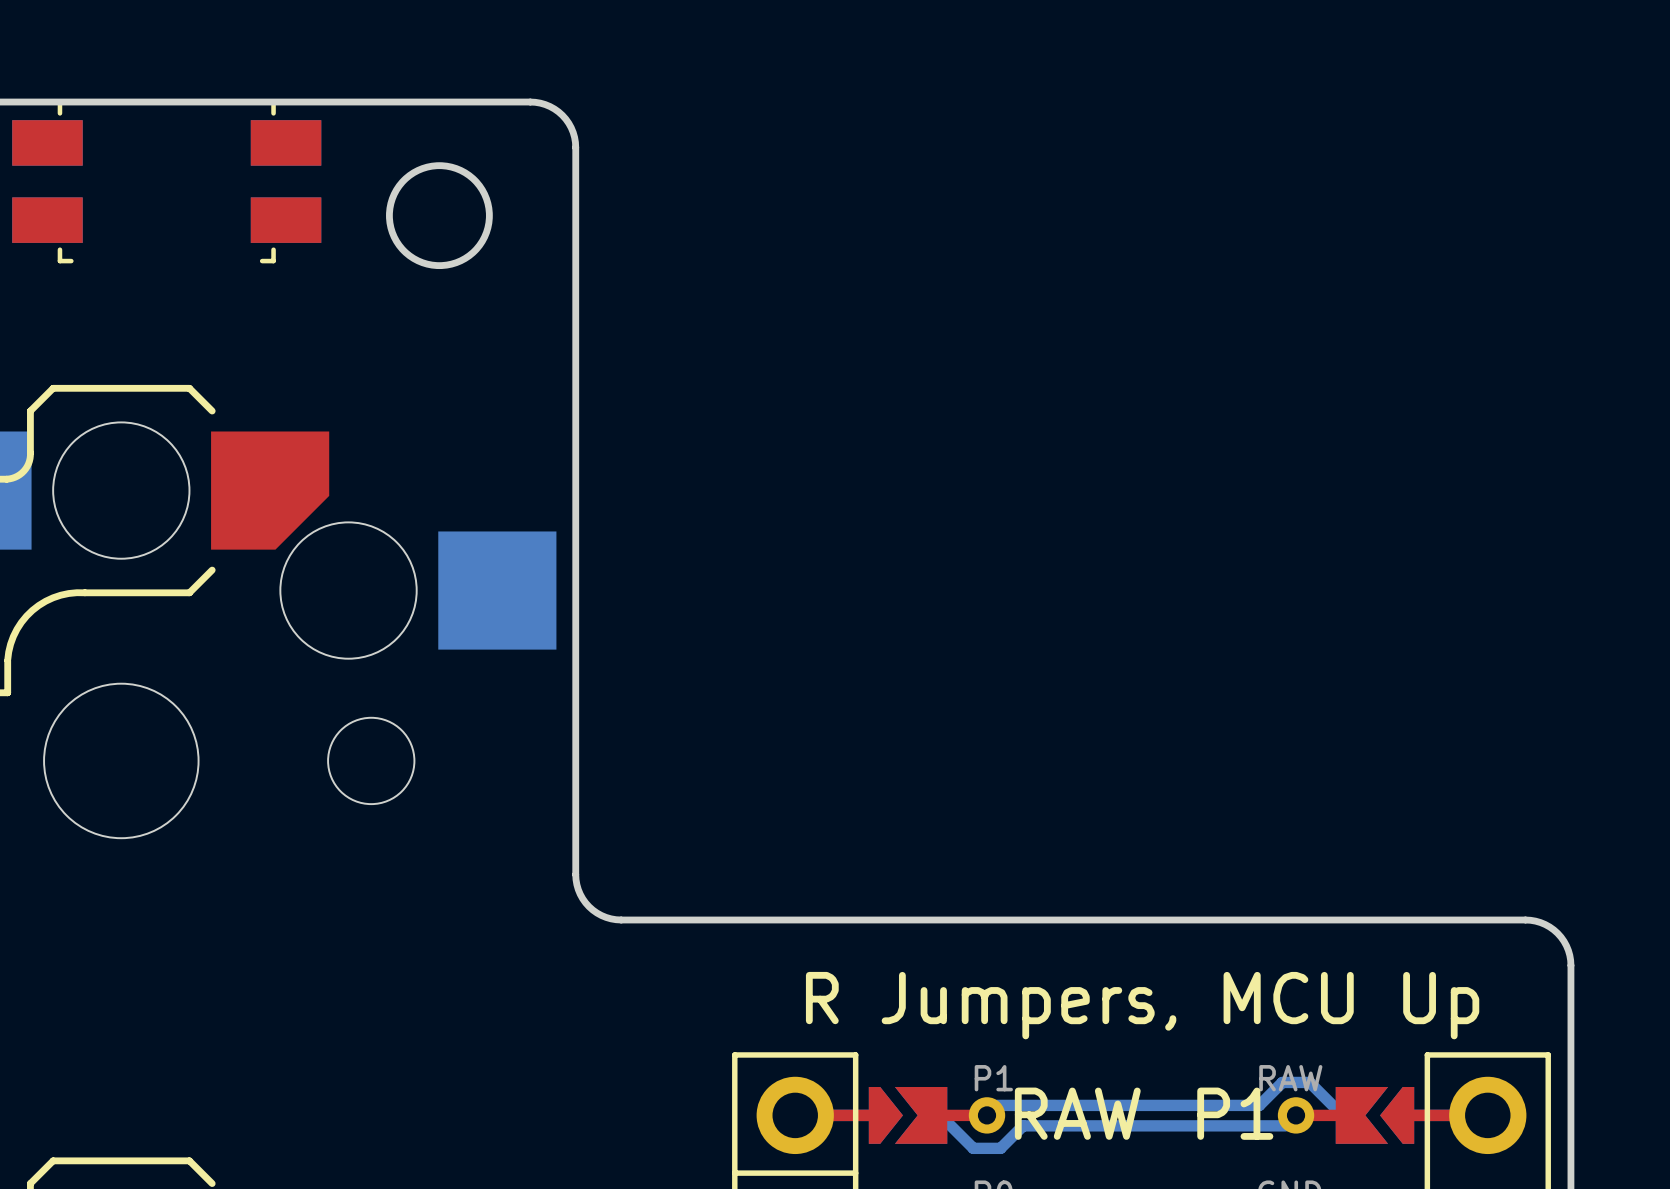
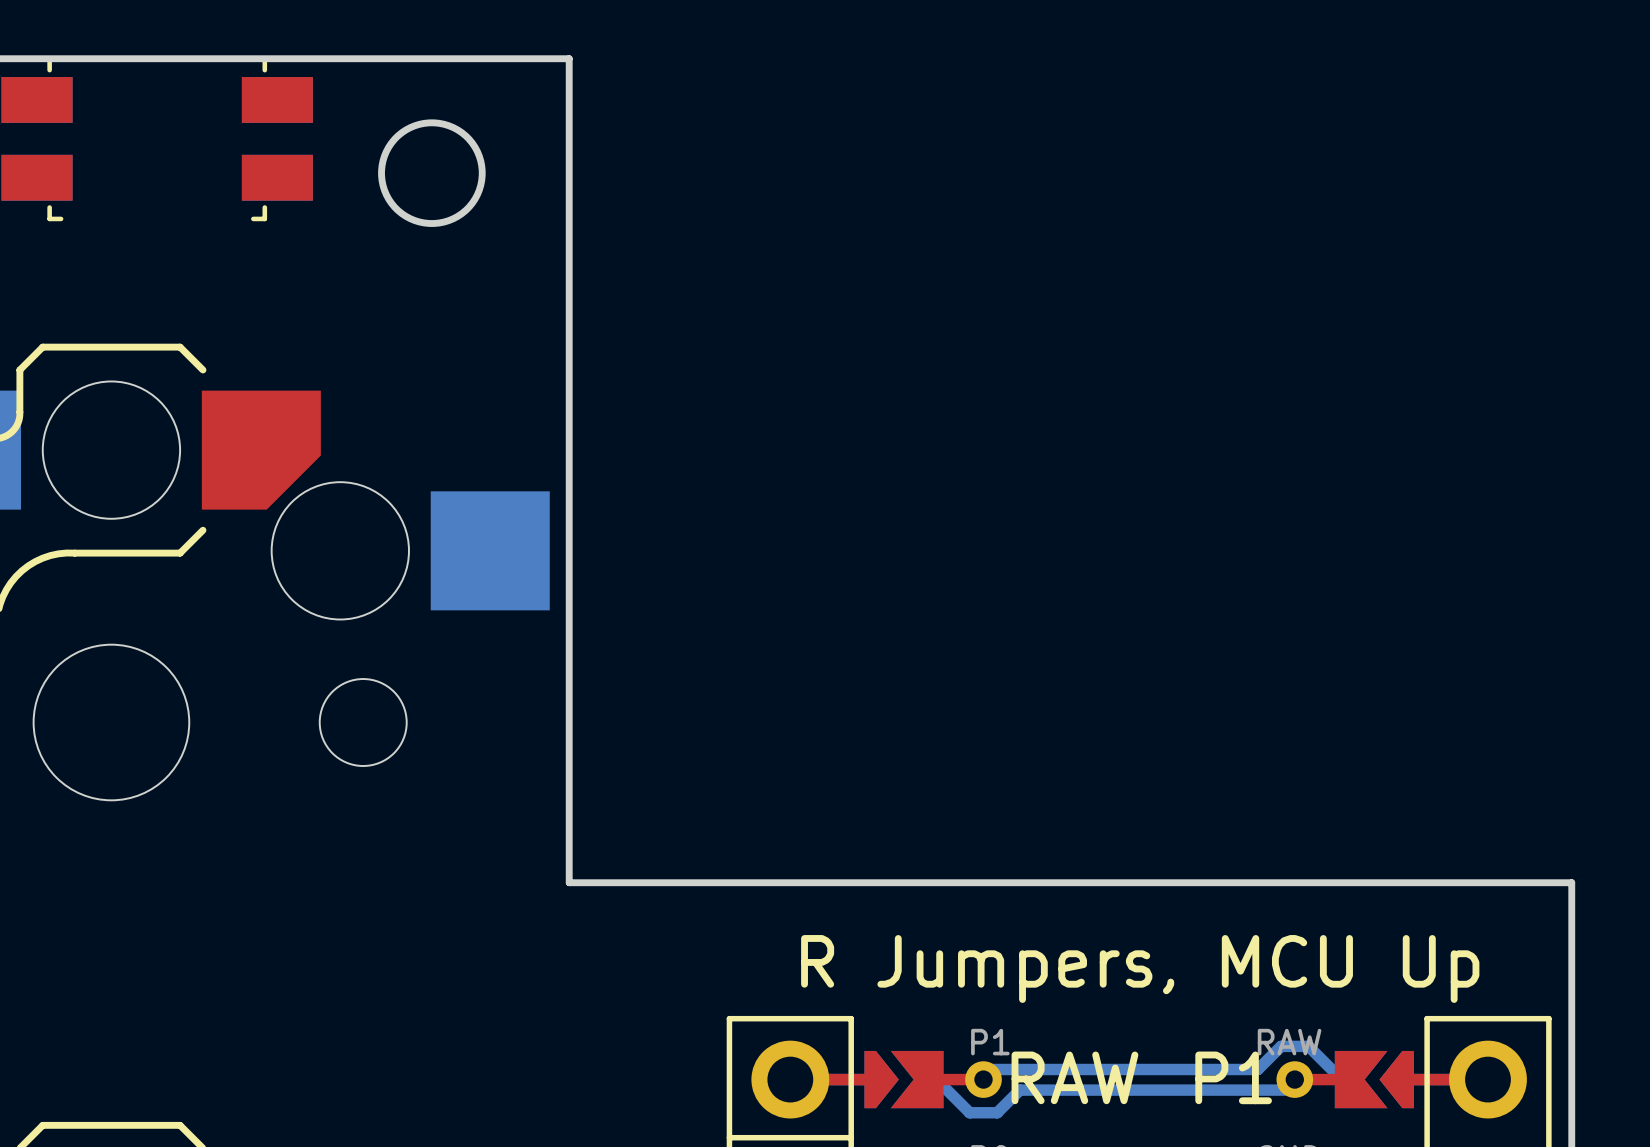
board edge: (530, 102) (545, 104) (562, 115) (573, 132) (575, 147) -> (523, 58) (569, 58) (569, 104)
board edge: (575, 874) (580, 894) (589, 906) (606, 917) (621, 920) -> (569, 836) (569, 882) (614, 882)
board edge: (1525, 920) (1545, 924) (1557, 933) (1566, 945) (1570, 965) -> (1525, 882) (1571, 882) (1571, 928)

